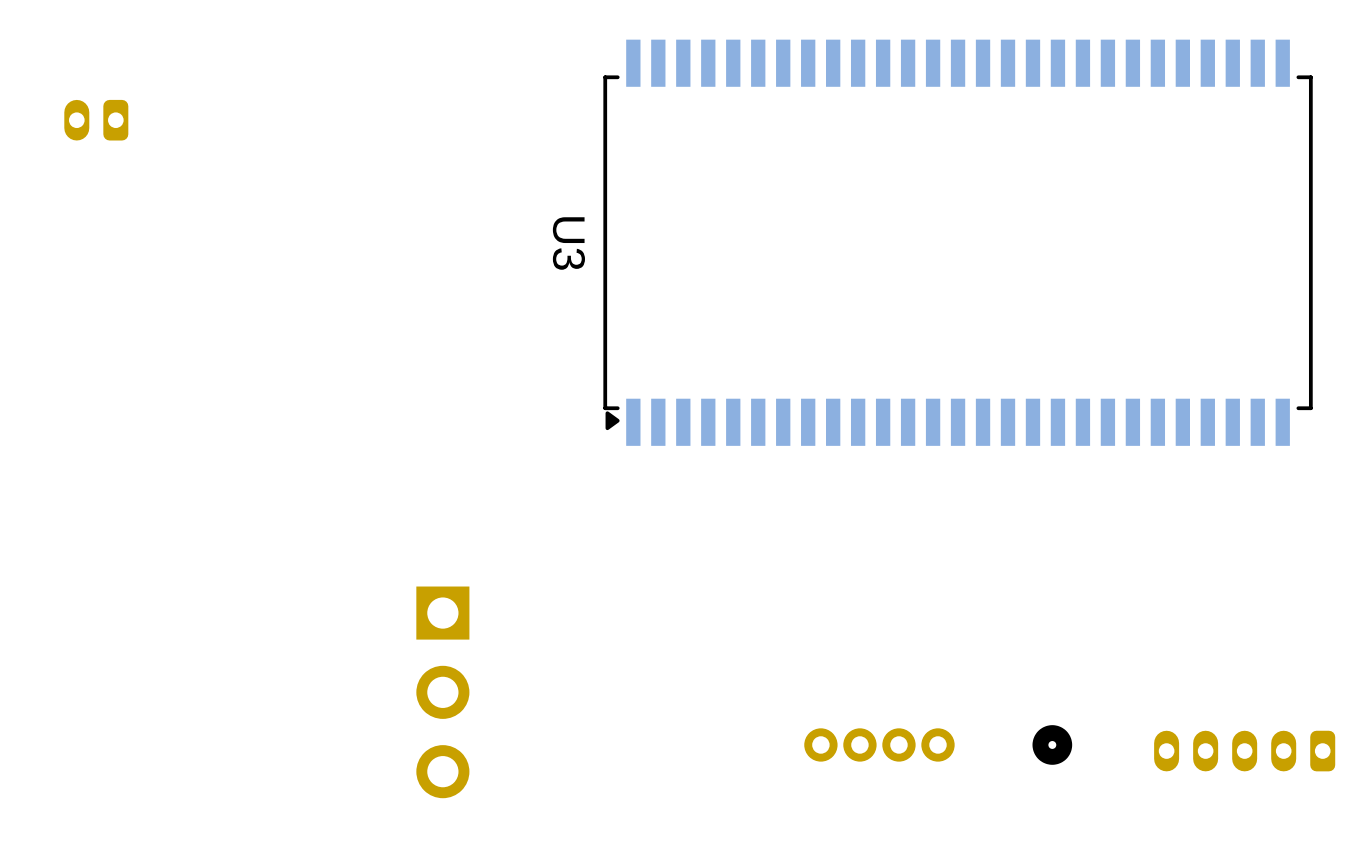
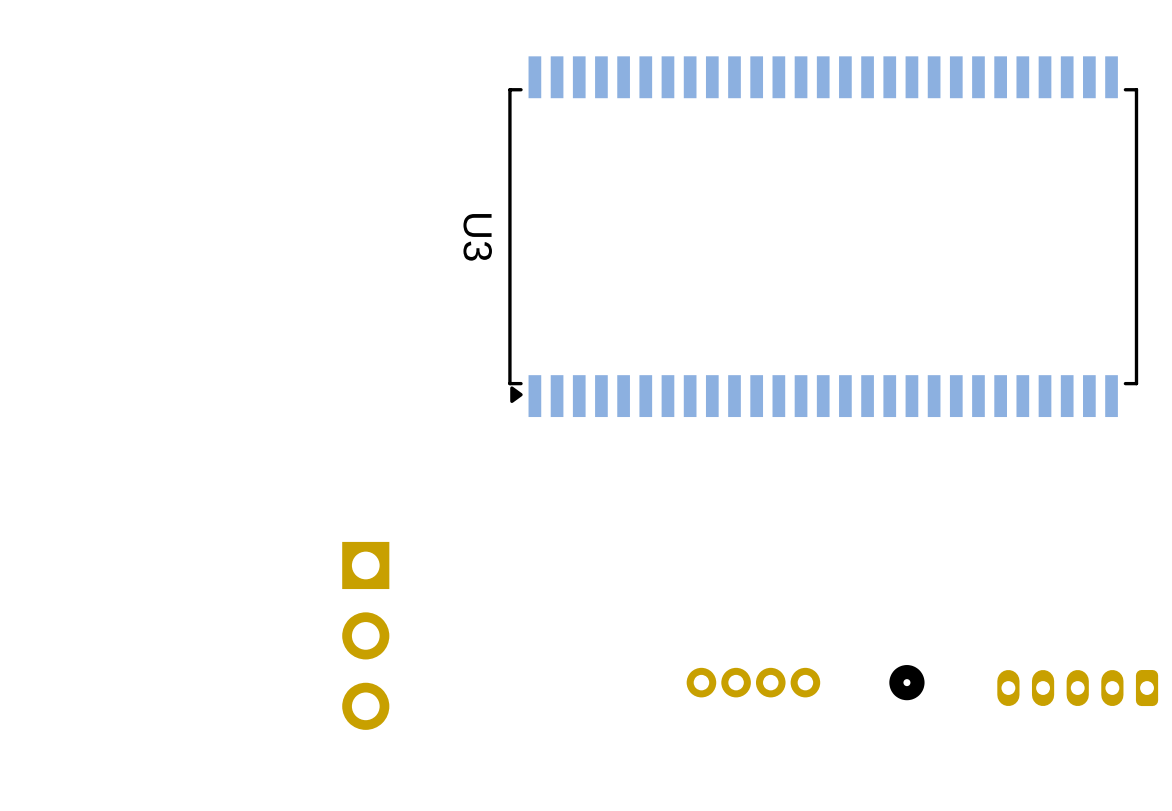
part: (96, 120) -> none

